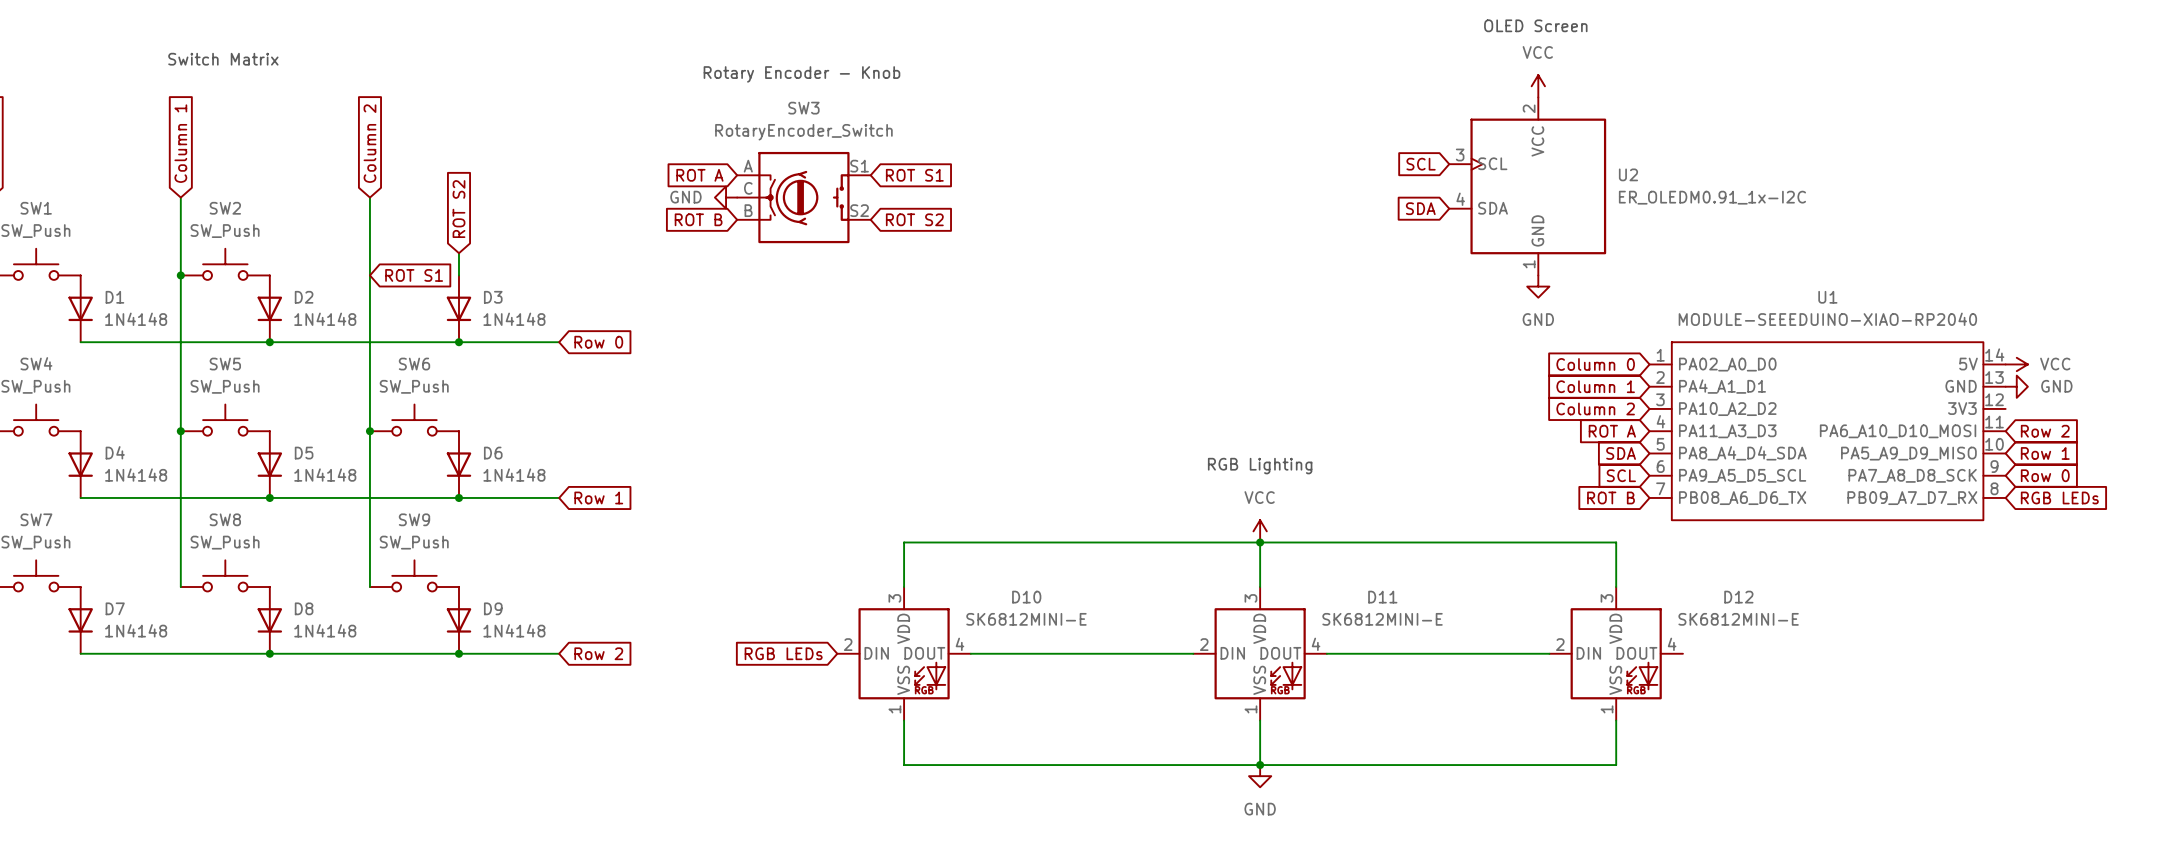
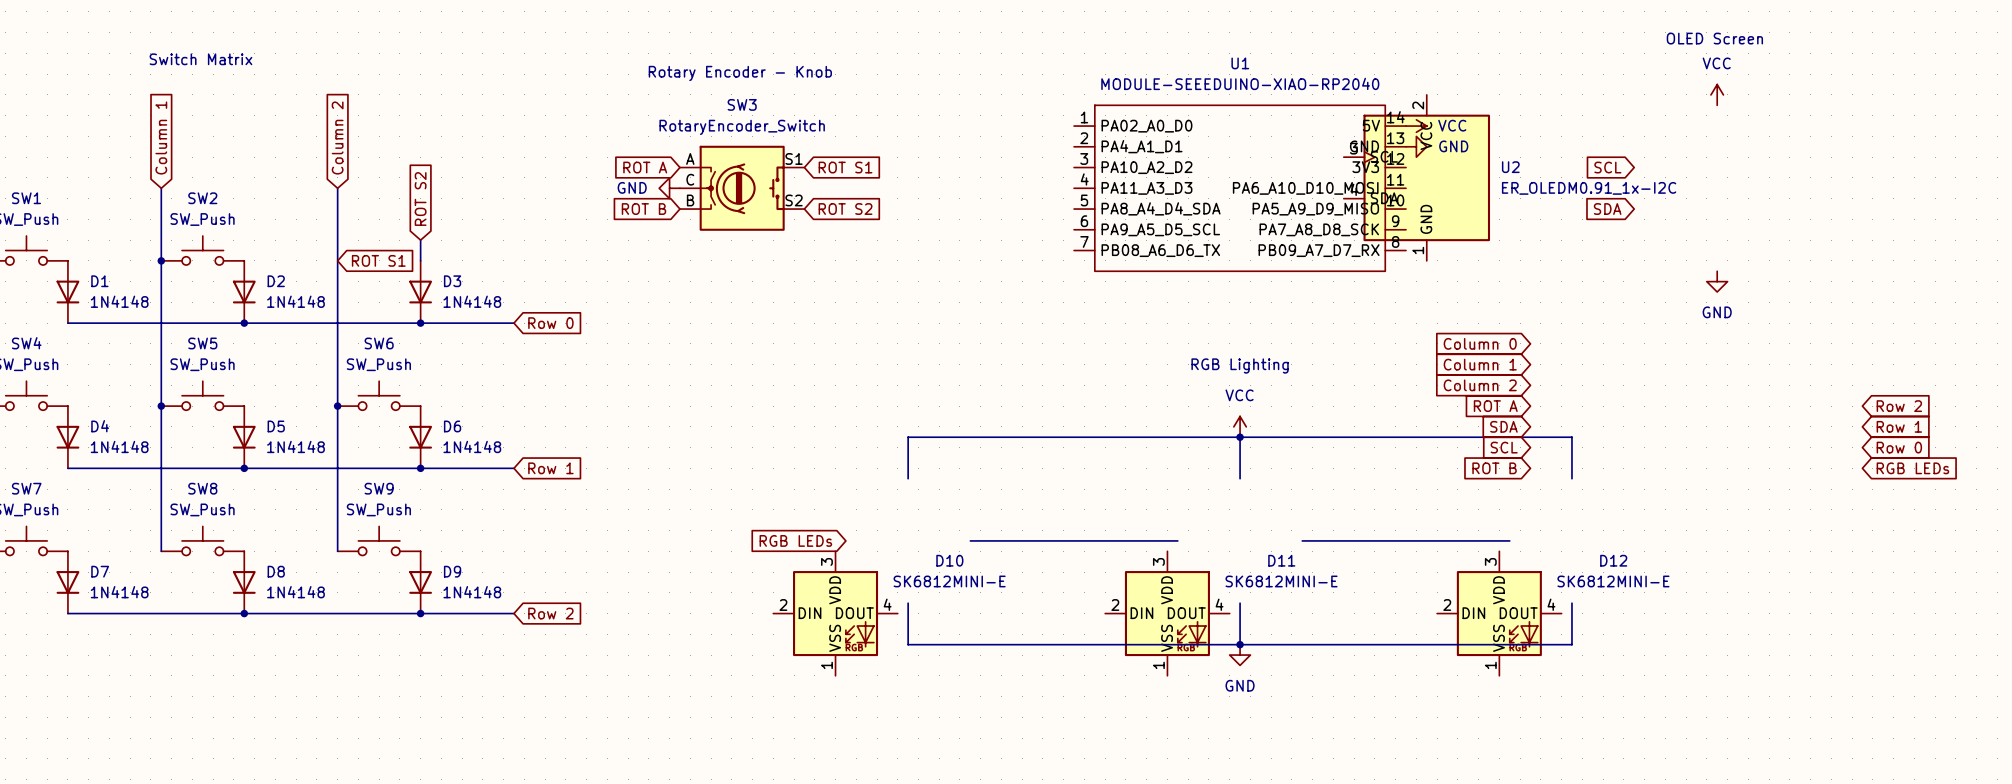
text: OLED Screen (1535, 25) -> none
text: none -> OLED Screen (1714, 38)
power symbol rotation: 0° (1538, 86) -> 90° clockwise (1416, 126)
power symbol position: VCC (1538, 86) -> VCC (1416, 126)
power symbol: none -> VCC (1717, 94)
global label: SCL (1421, 164) -> none
global label: none -> SCL (1607, 167)
global label: SDA (1420, 208) -> none
global label: none -> SDA (1607, 209)
power symbol rotation: 0° (1538, 286) -> 90° counterclockwise (1416, 146)
power symbol position: GND (1538, 286) -> GND (1416, 146)
power symbol: none -> GND (1717, 281)
power symbol: VCC (2016, 364) -> none
power symbol: GND (2016, 386) -> none
U1 position: (1827, 431) -> (1240, 188)
junction: none -> (1240, 437)
text position: RGB Lighting (1260, 466) -> RGB Lighting (1240, 365)
power symbol position: VCC (1260, 531) -> VCC (1240, 426)
wire: (1260, 542) (1260, 587) -> (1240, 437) (1240, 478)
junction: (1260, 542) -> none
wire: (904, 587) (904, 542) (1616, 542) (1616, 587) -> (908, 478) (908, 437) (1571, 437) (1571, 478)
global label position: RGB LEDs (783, 653) -> RGB LEDs (795, 540)
wire: (970, 653) (1193, 653) -> (970, 540) (1177, 540)
wire: (1326, 653) (1549, 653) -> (1302, 540) (1509, 540)
junction: none -> (1240, 644)
wire: (904, 720) (904, 765) (1616, 765) (1616, 720) -> (908, 603) (908, 644) (1571, 644) (1571, 603)
wire: (1260, 720) (1260, 765) -> (1240, 603) (1240, 644)
junction: (1260, 765) -> none
power symbol position: GND (1260, 776) -> GND (1240, 655)

